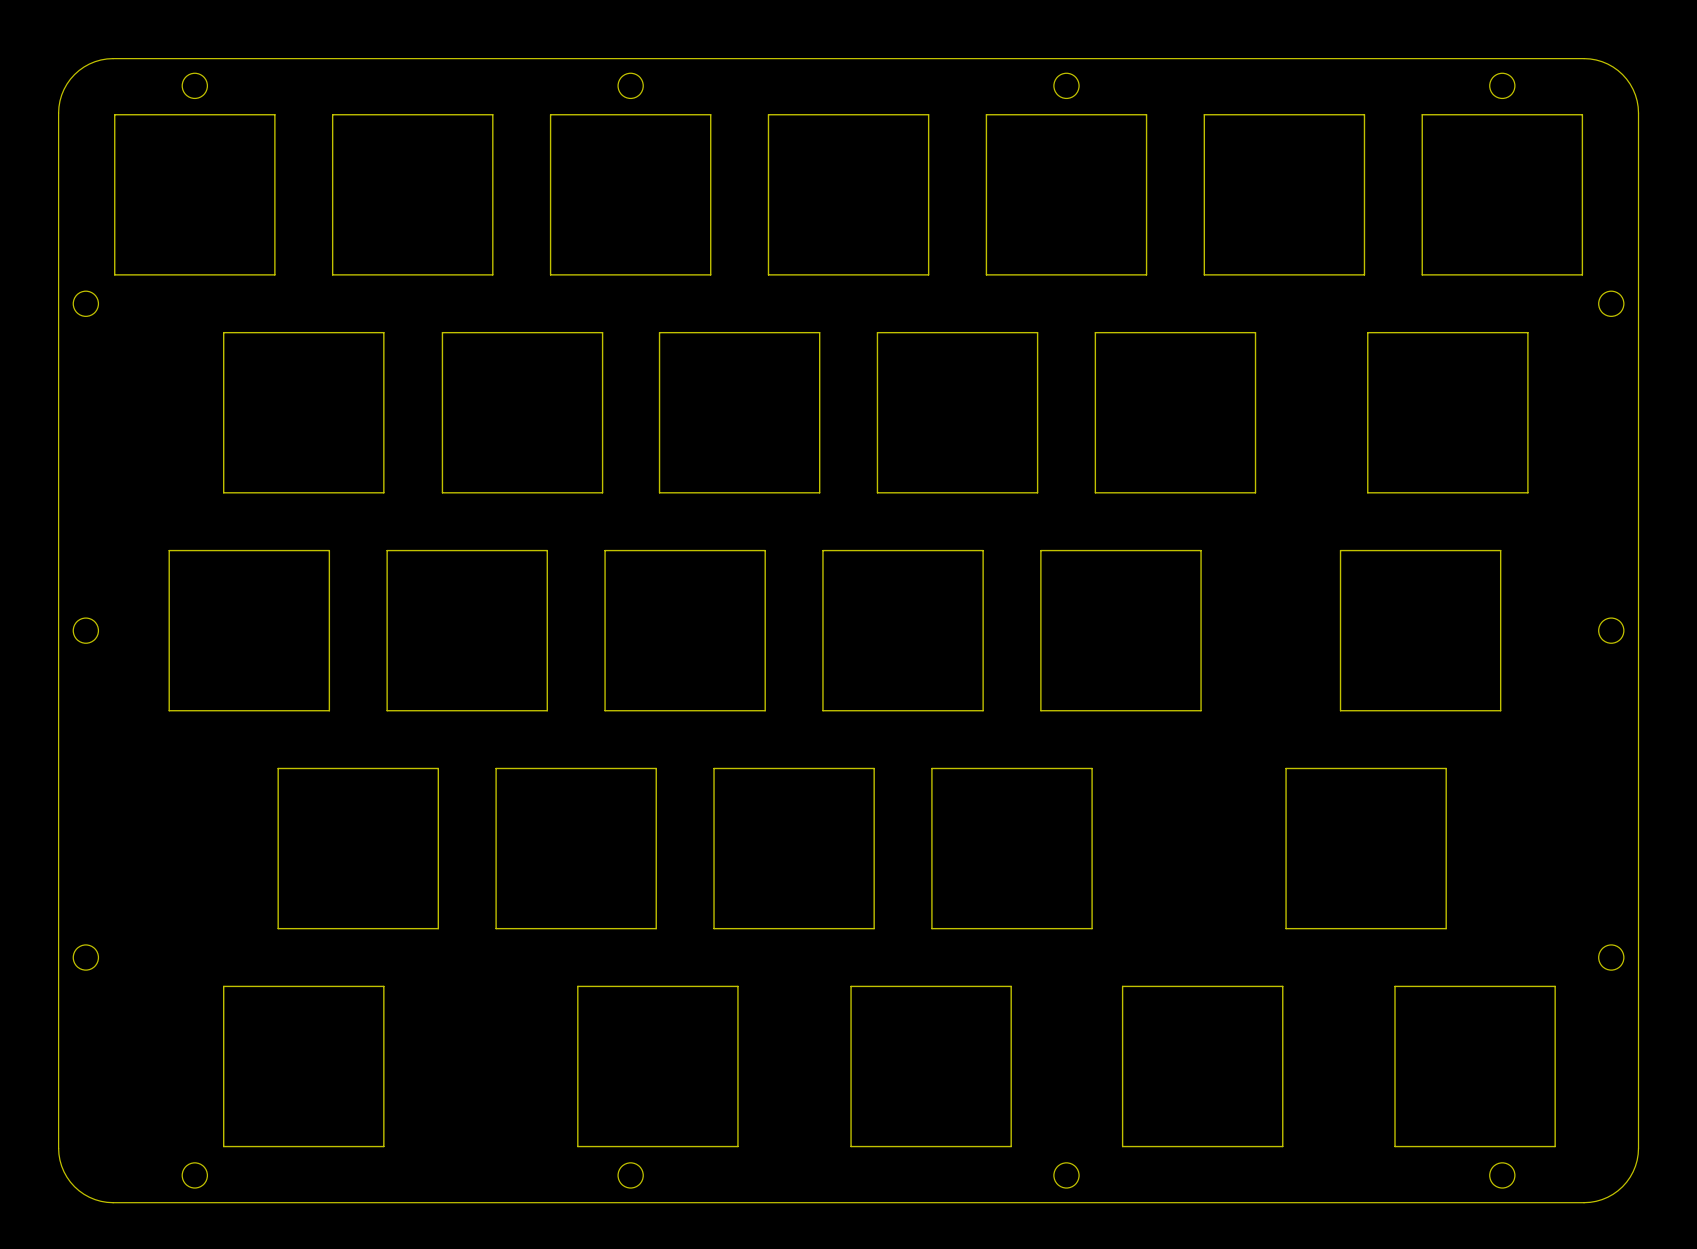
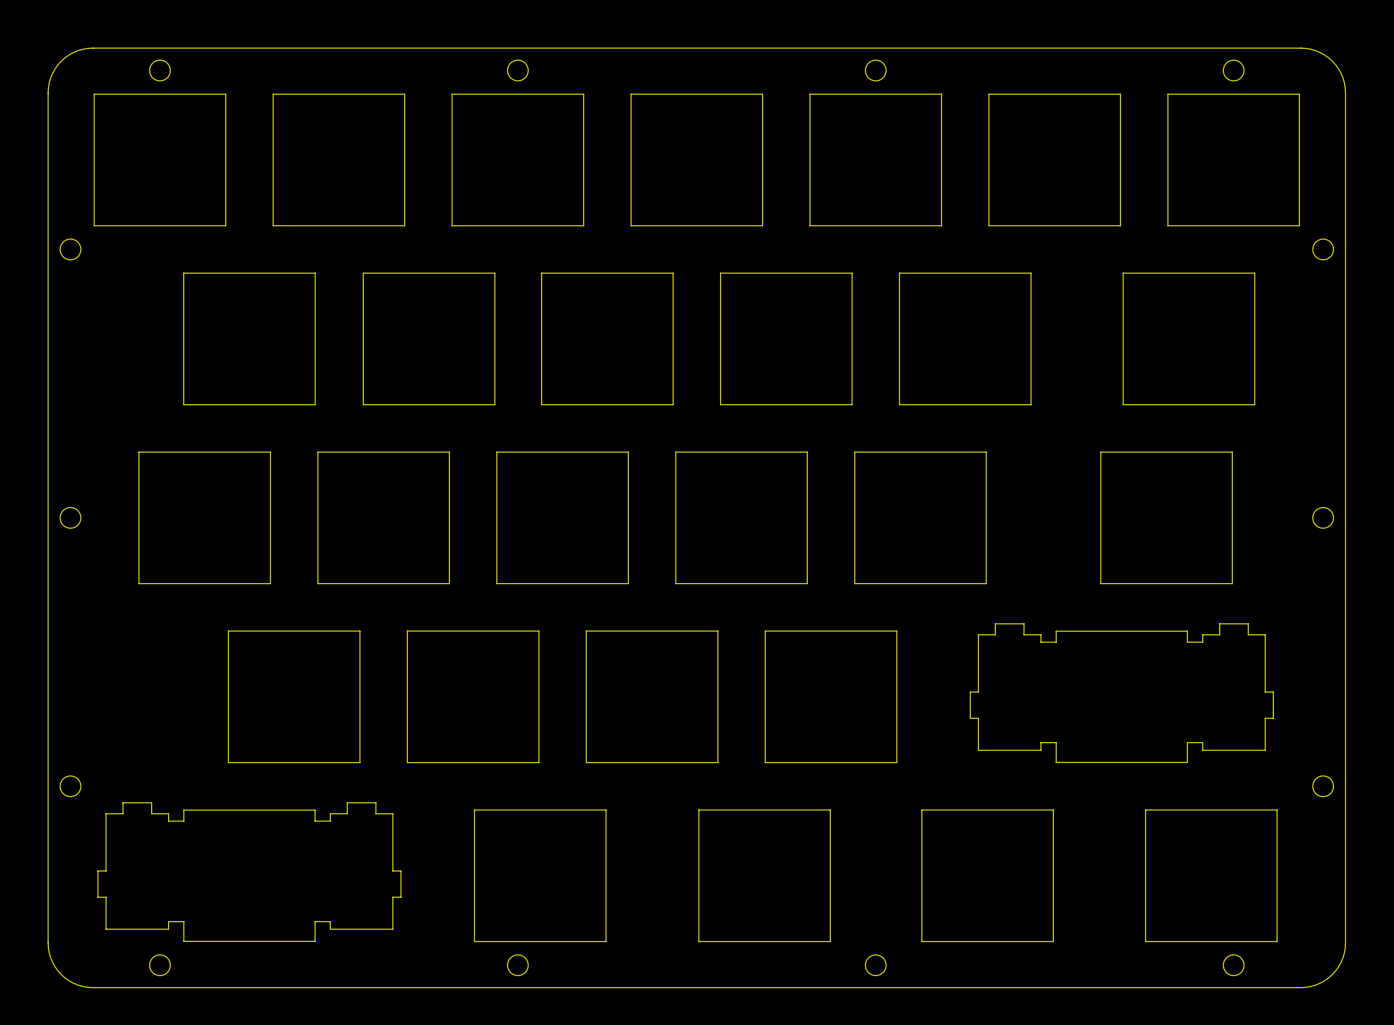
drawing shape: [1285, 767, 1447, 930] -> [969, 623, 1274, 764]
drawing shape: [223, 985, 385, 1148] -> [97, 802, 402, 942]

